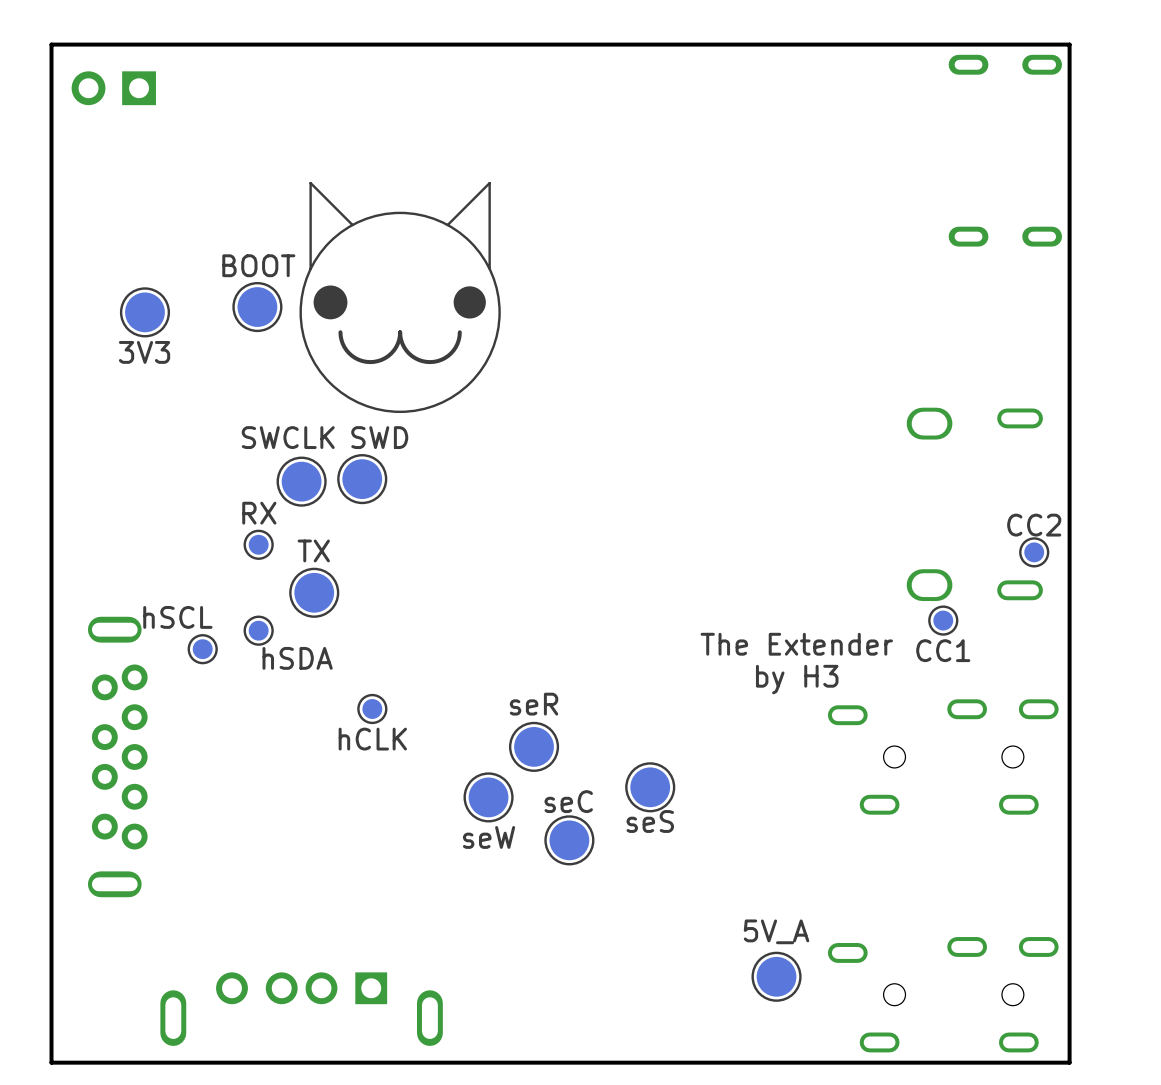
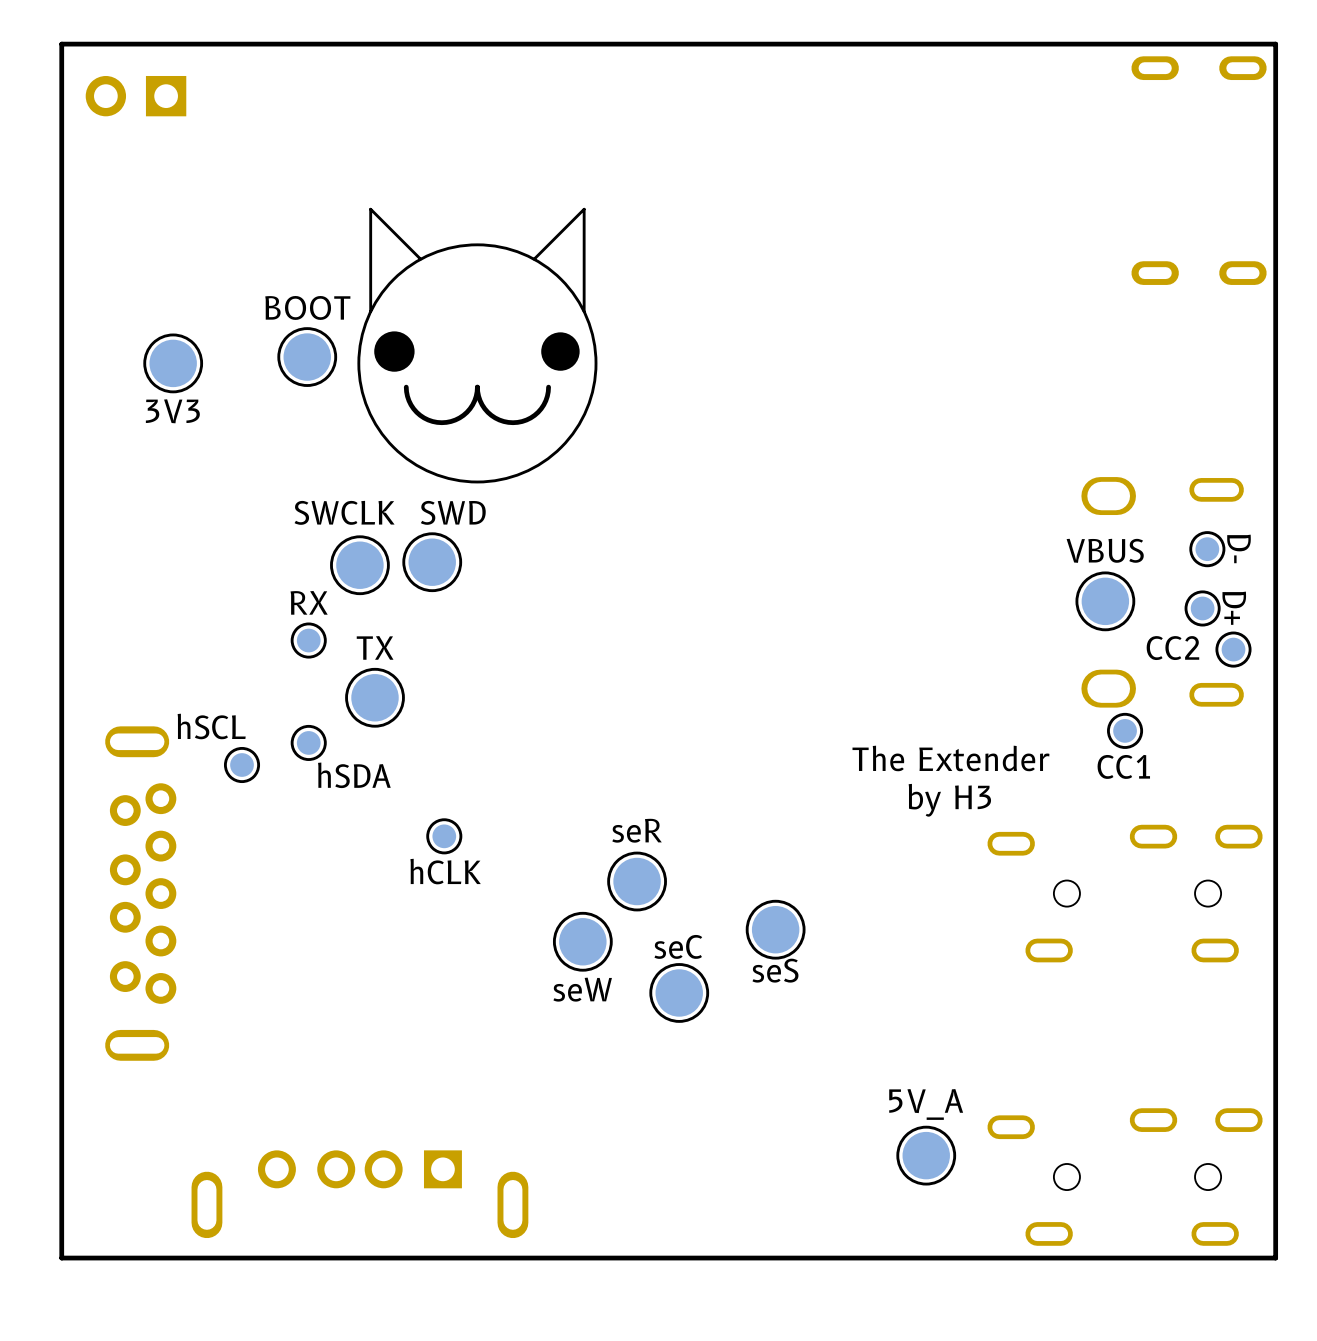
part: none -> D- (1207, 549)
part: none -> VBUS (1105, 601)
part: none -> D+ (1202, 608)
part value position: CC2 (1034, 525) -> CC2 (1172, 648)

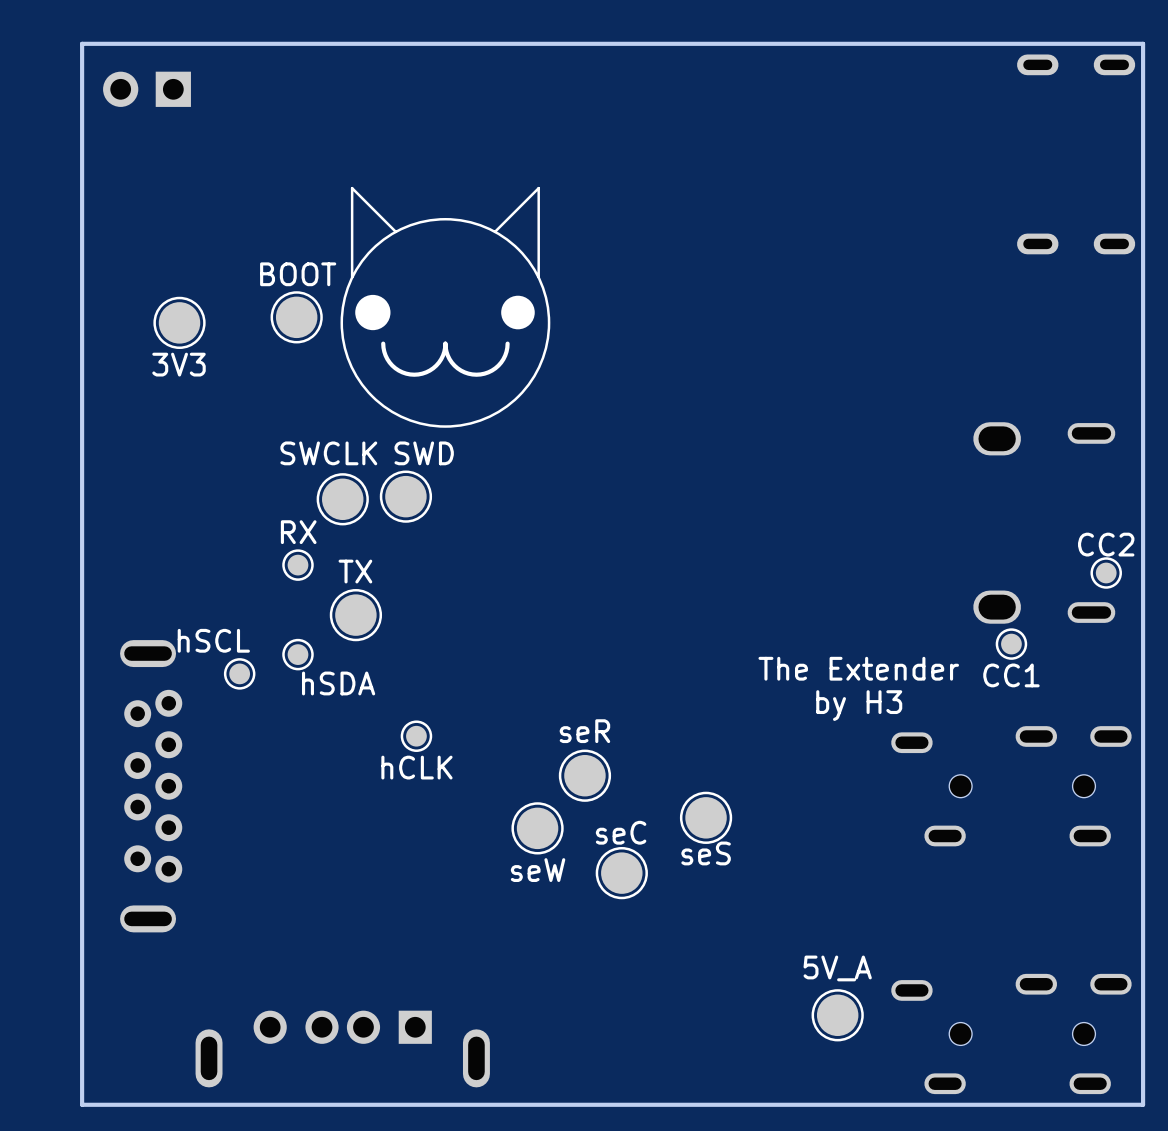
part: D- (1207, 549) -> none
part: VBUS (1105, 601) -> none
part: D+ (1202, 608) -> none
part value position: CC2 (1172, 648) -> CC2 (1106, 544)

